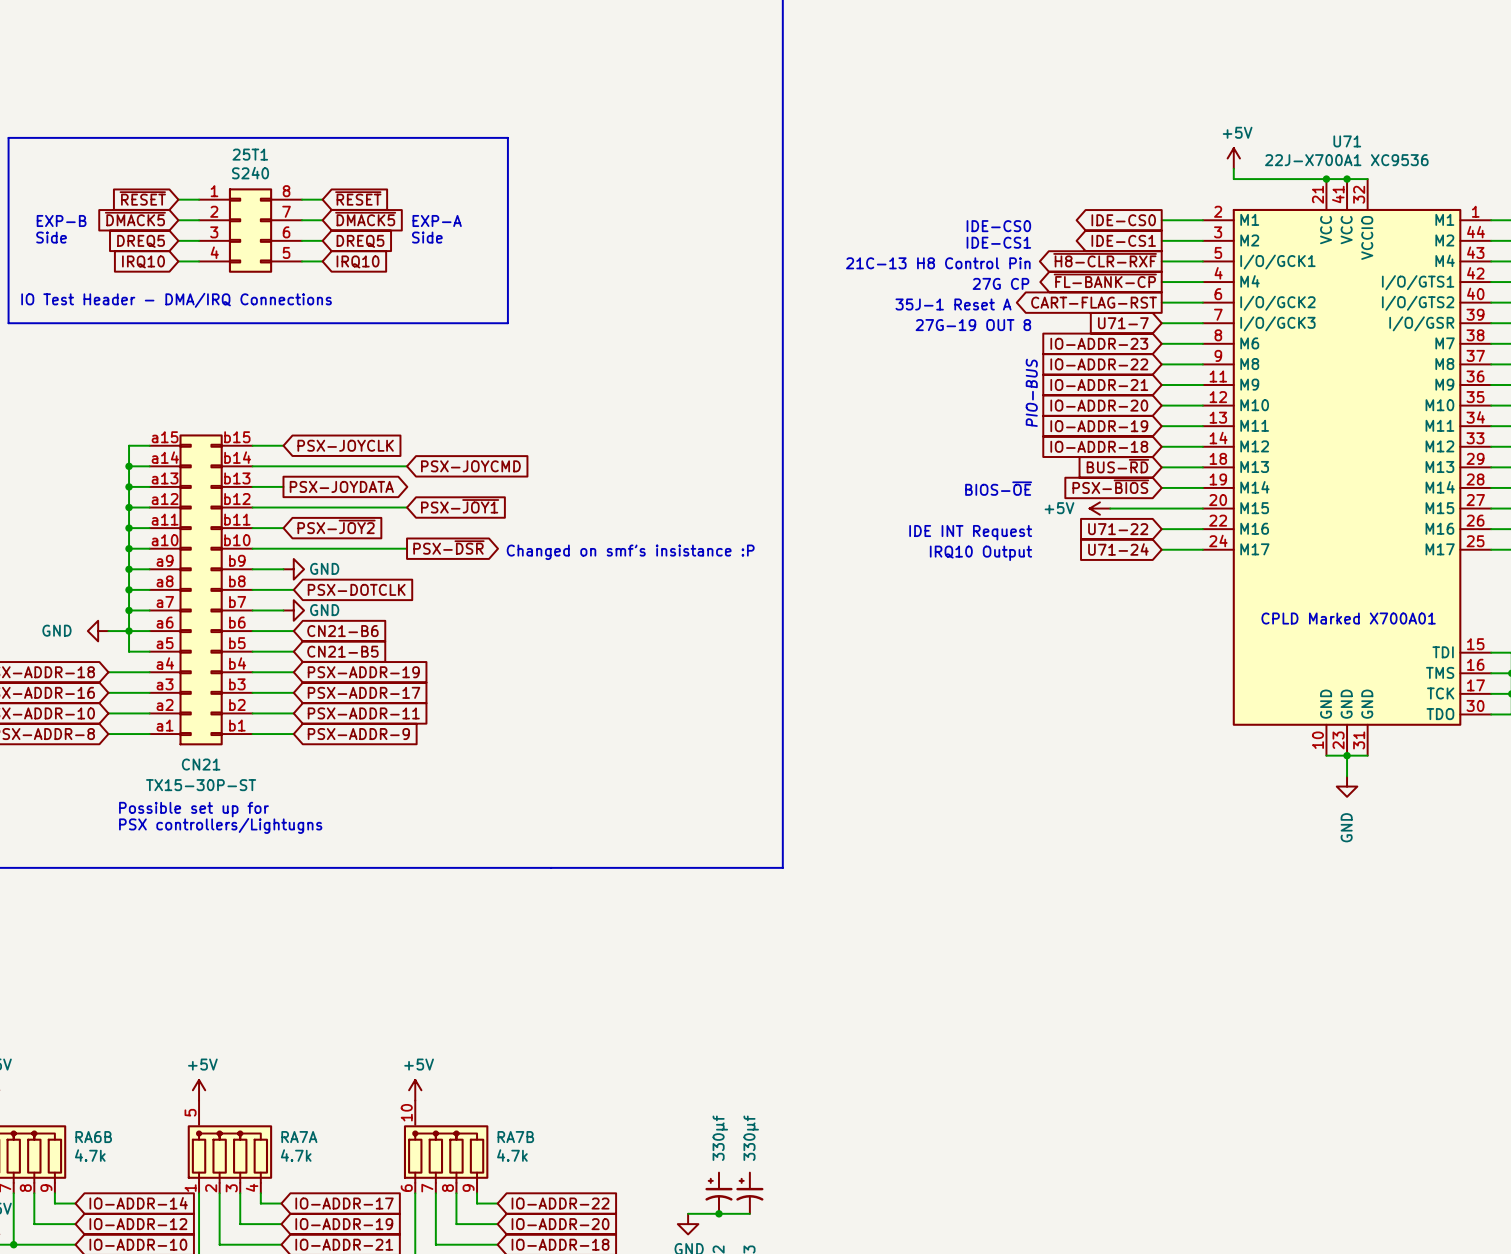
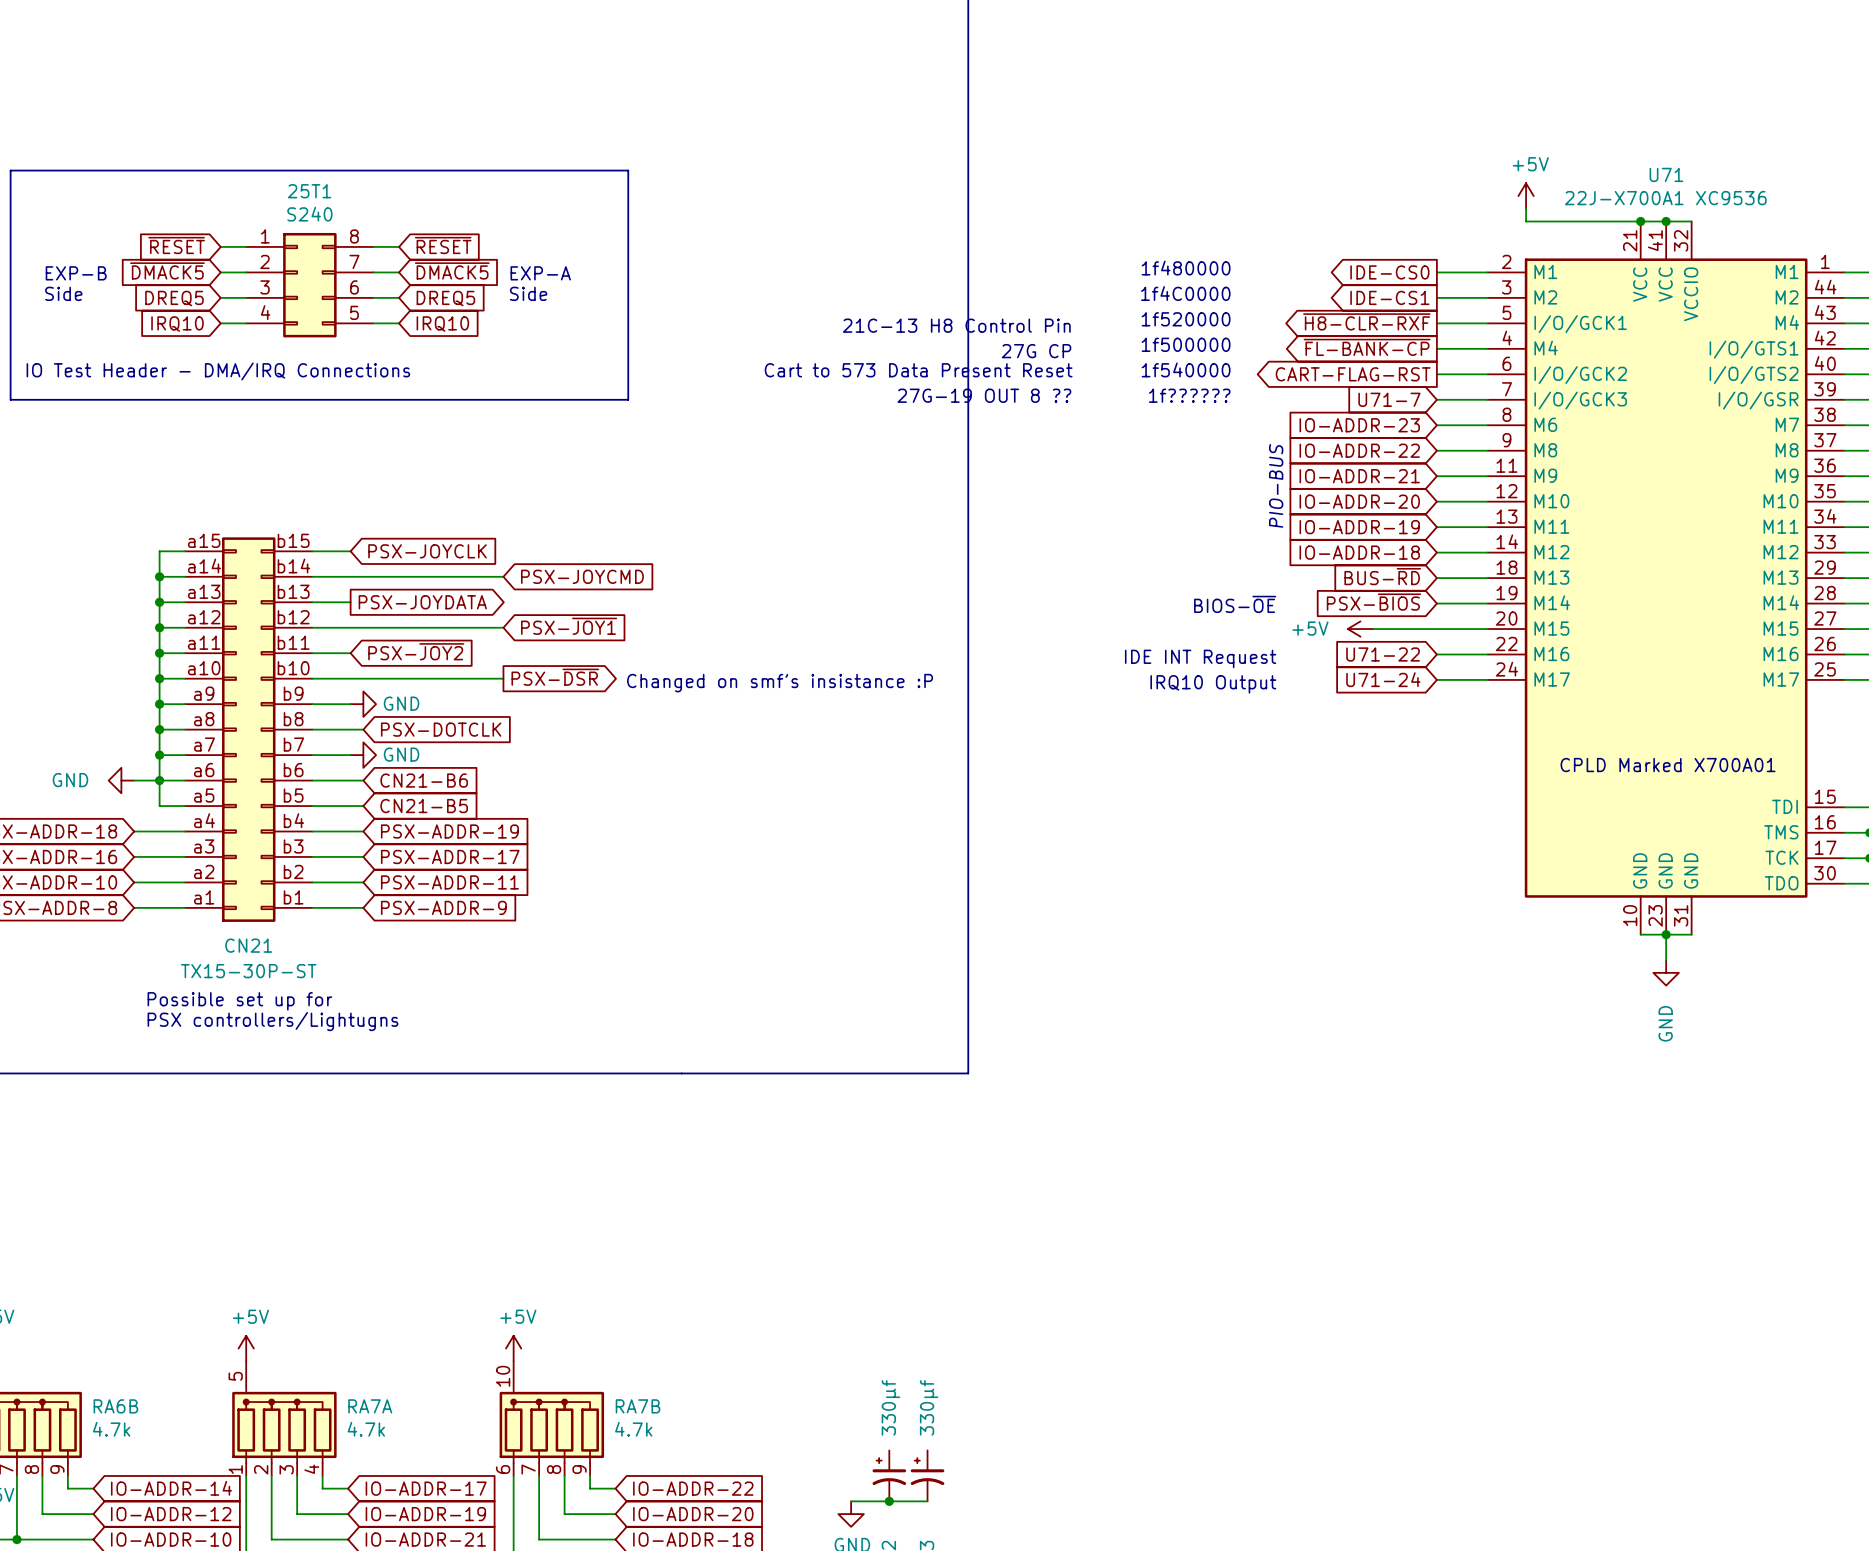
text: none -> 1f480000 (1186, 268)
text: IDE-CS0 (998, 226) -> none
text: none -> 1f4C0000 (1185, 293)
text: IDE-CS1 (998, 242) -> none
text: none -> 1f520000 (1186, 319)
text position: 21C-13 H8 Control Pin (938, 263) -> 21C-13 H8 Control Pin (956, 325)
text: none -> 1f500000 (1186, 344)
text position: 27G CP (1000, 283) -> 27G CP (1036, 351)
text: none -> Cart to 573 Data Present Reset (918, 370)
text: none -> 1f540000 (1186, 369)
text: 35J-1 Reset A (953, 304) -> none
text: none -> 27G-19 OUT 8 ?? (984, 395)
text: none -> 1f?????? (1189, 395)
text: 27G-19 OUT 8 (973, 325) -> none

